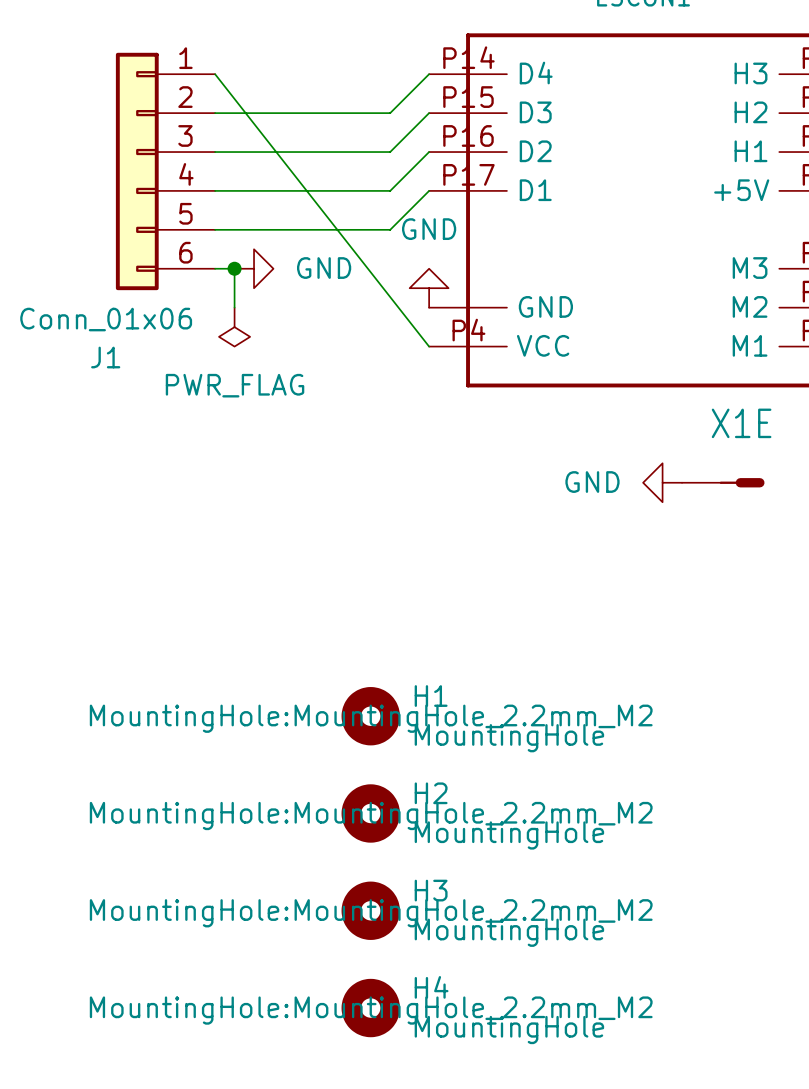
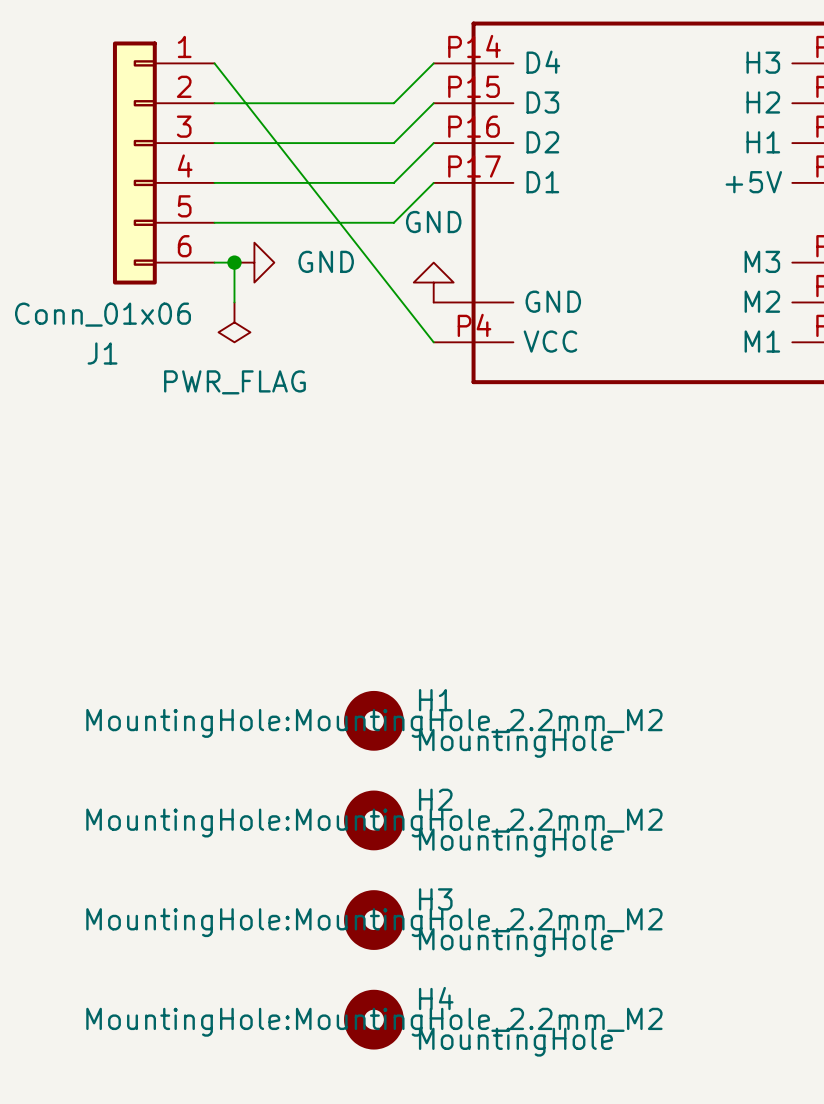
power symbol: GND (662, 482) -> none
X1E: (723, 482) -> none

